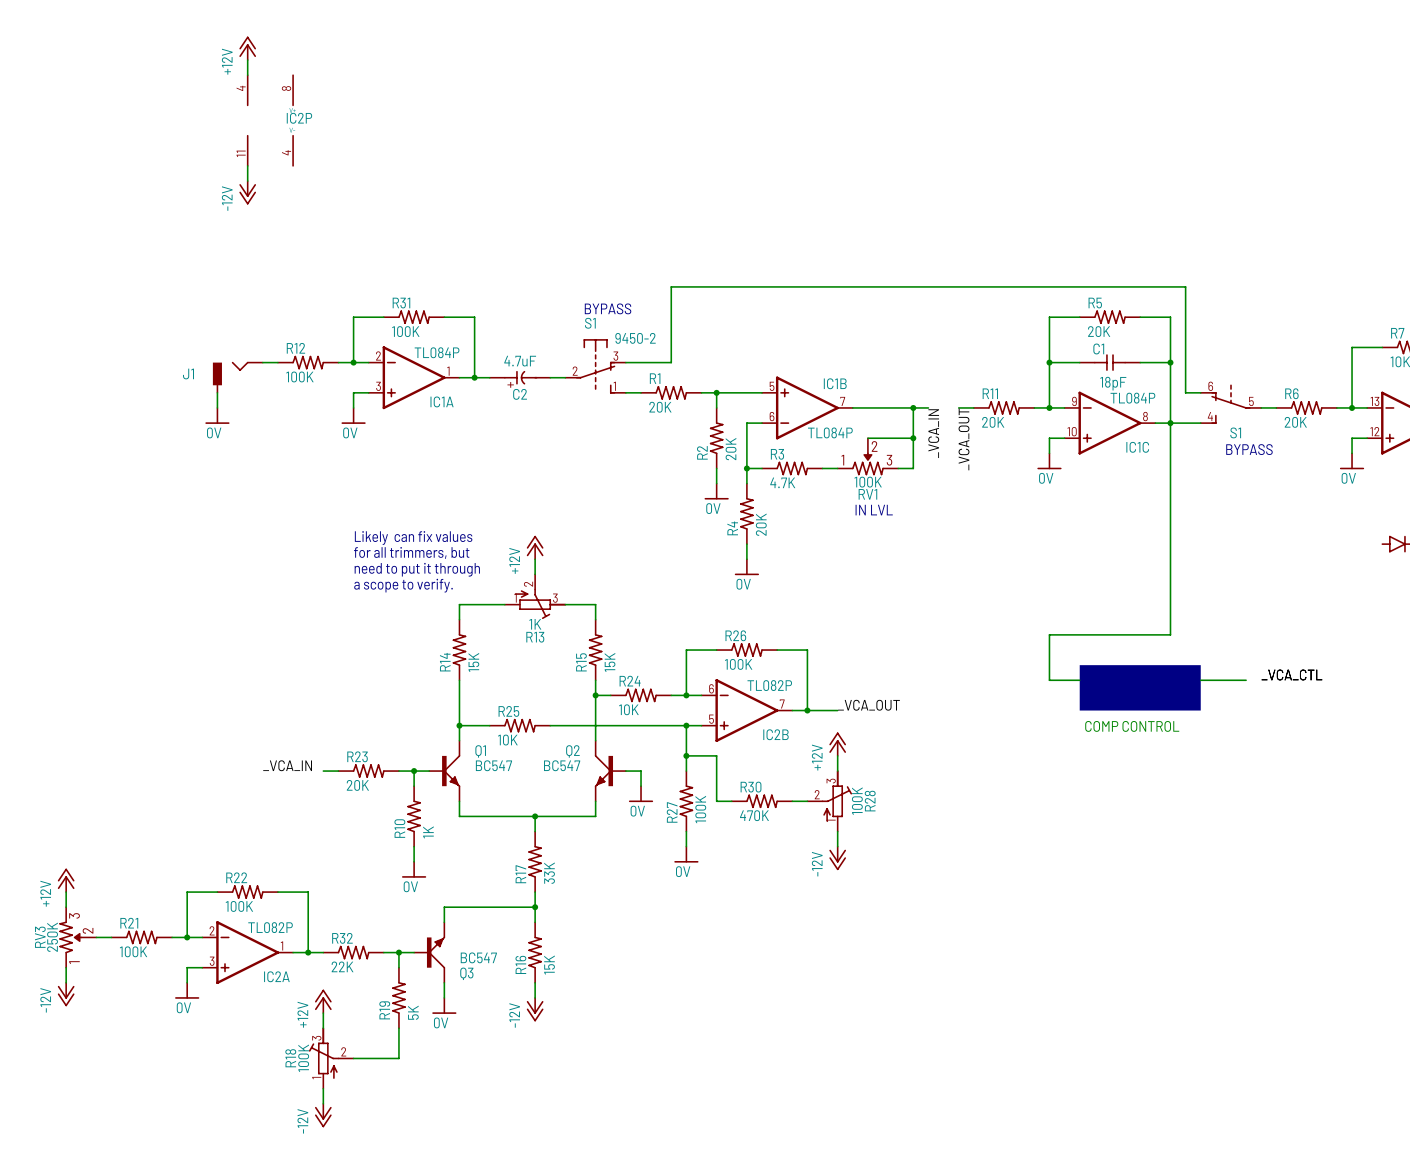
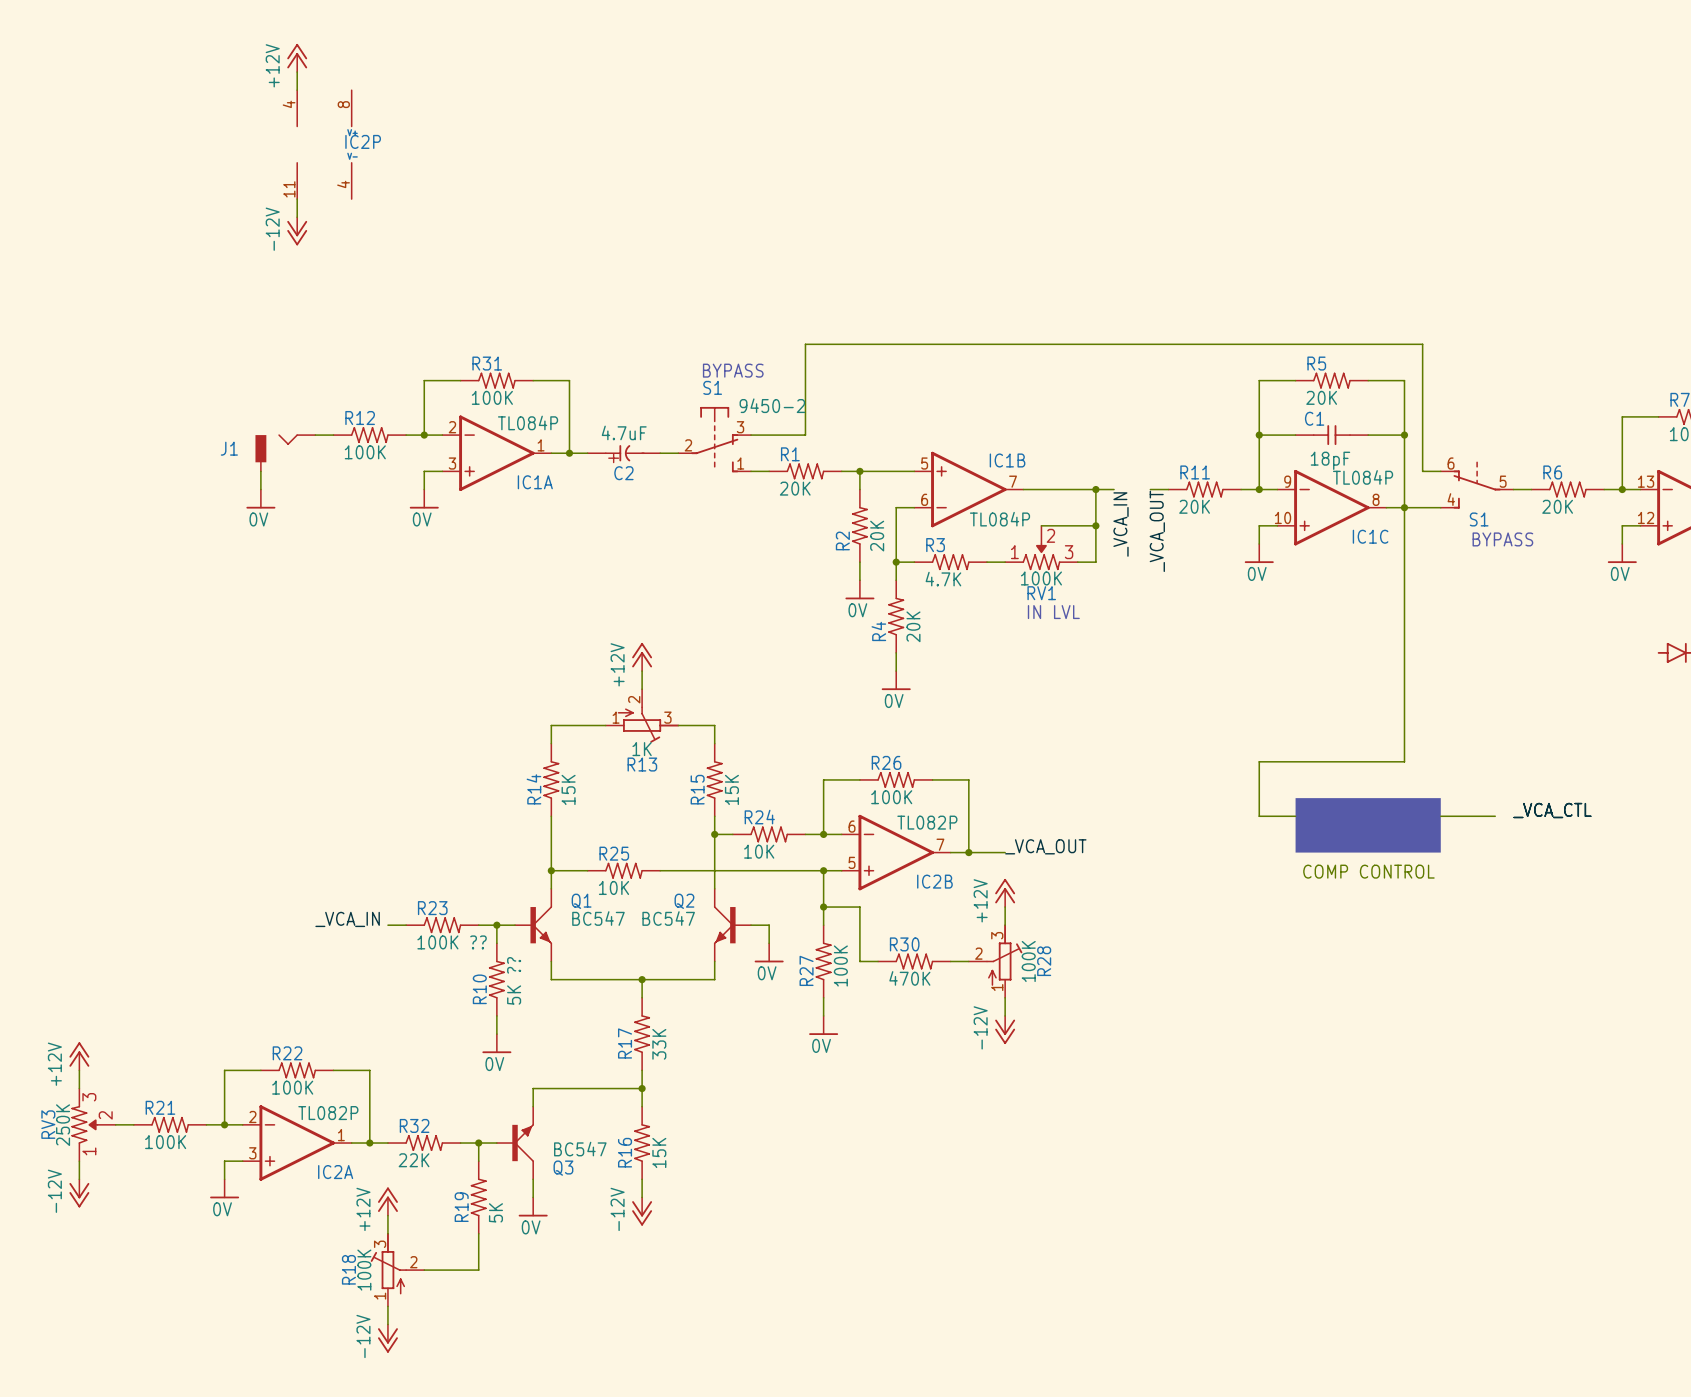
text: Likely can fix values (413, 538) -> none
text: for all trimmers, but (411, 552) -> none
text: need to put it through (417, 569) -> none
text: a scope to verify. (403, 585) -> none
R23 value: 20K (357, 785) -> 100K ?? (452, 942)
R10 value: 1K (428, 832) -> 5K ?? (514, 980)

